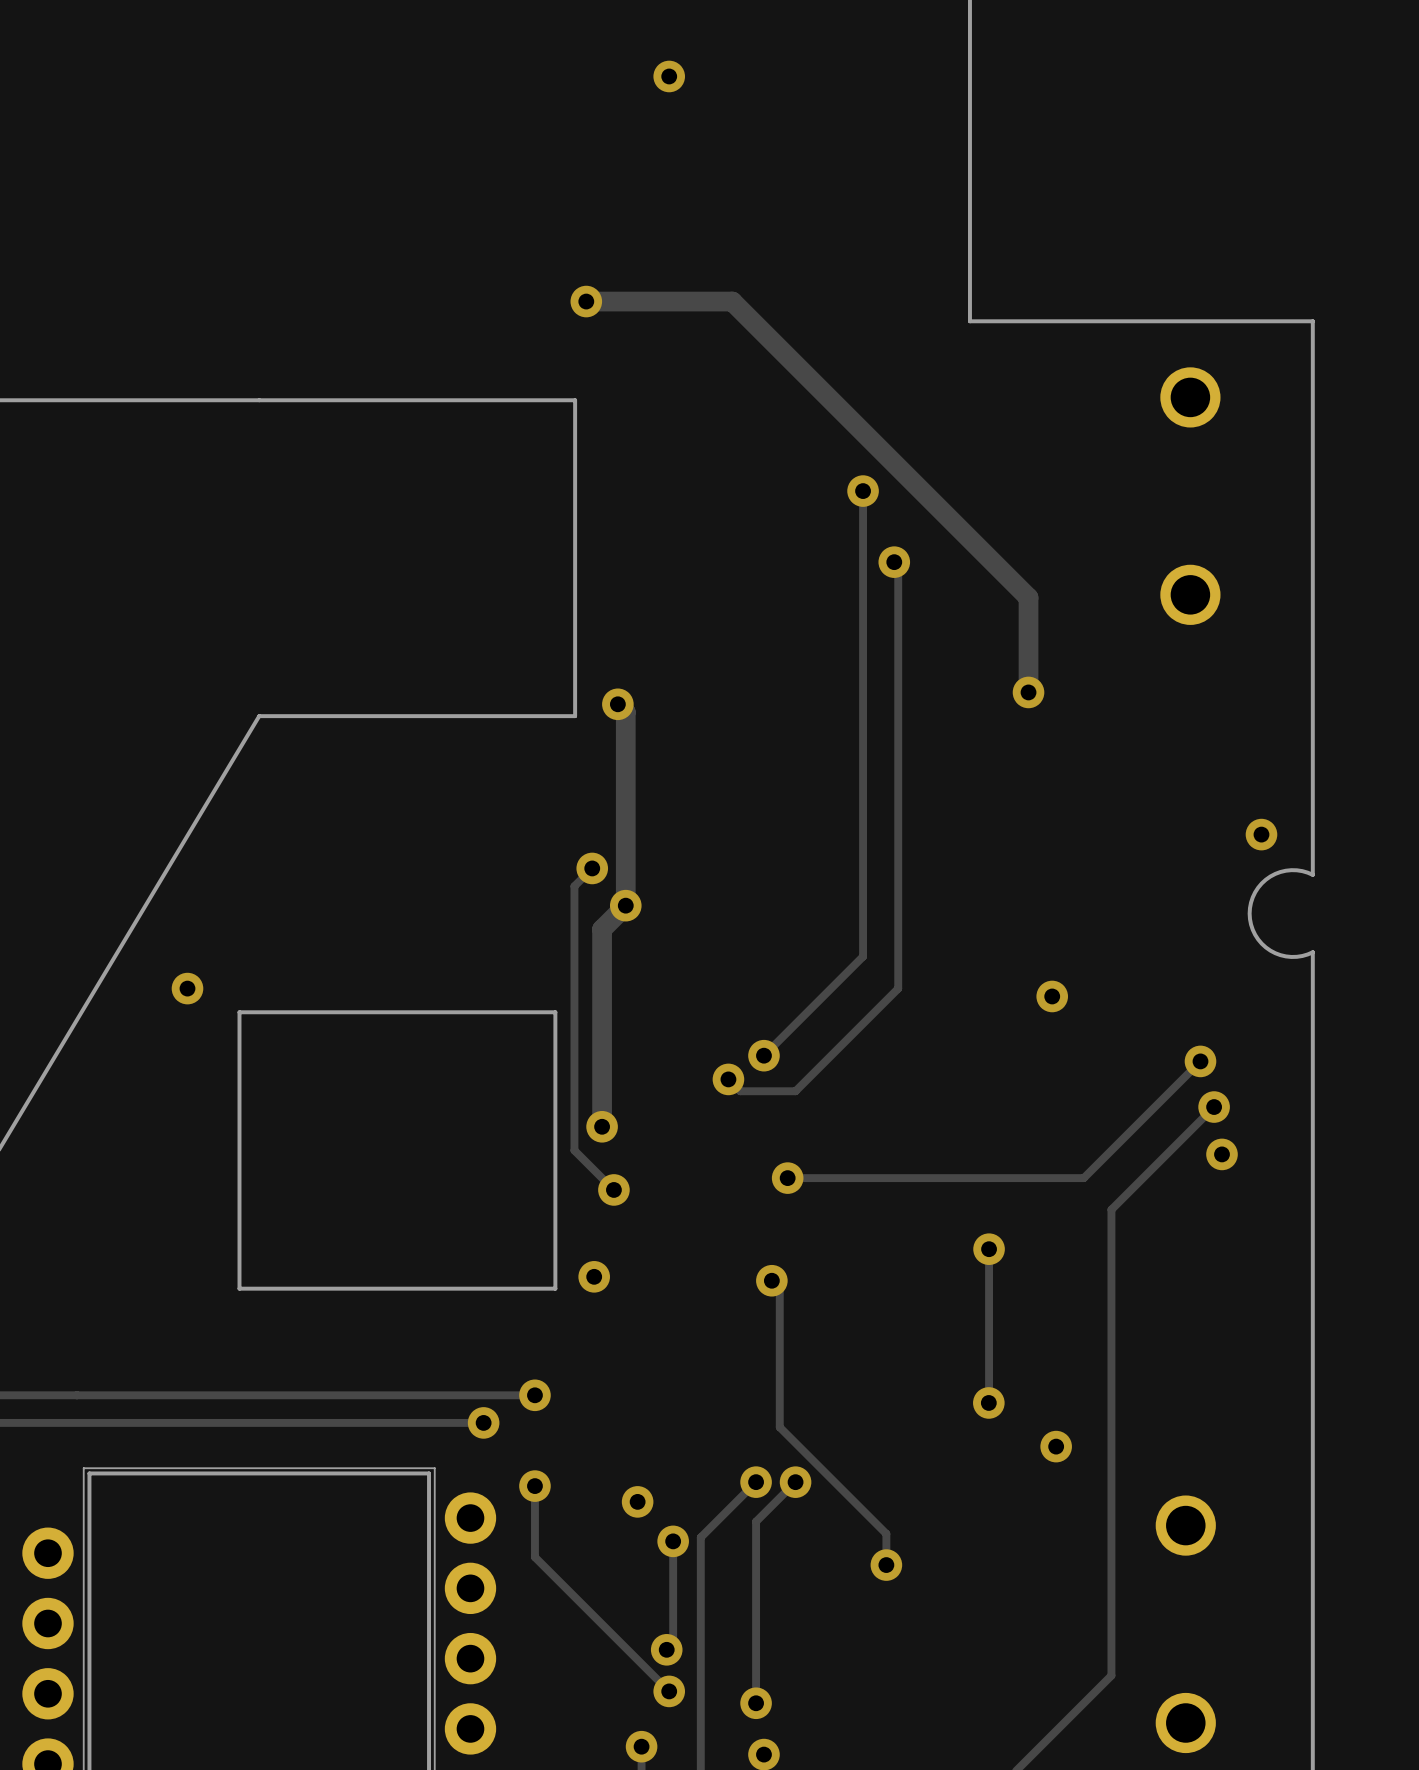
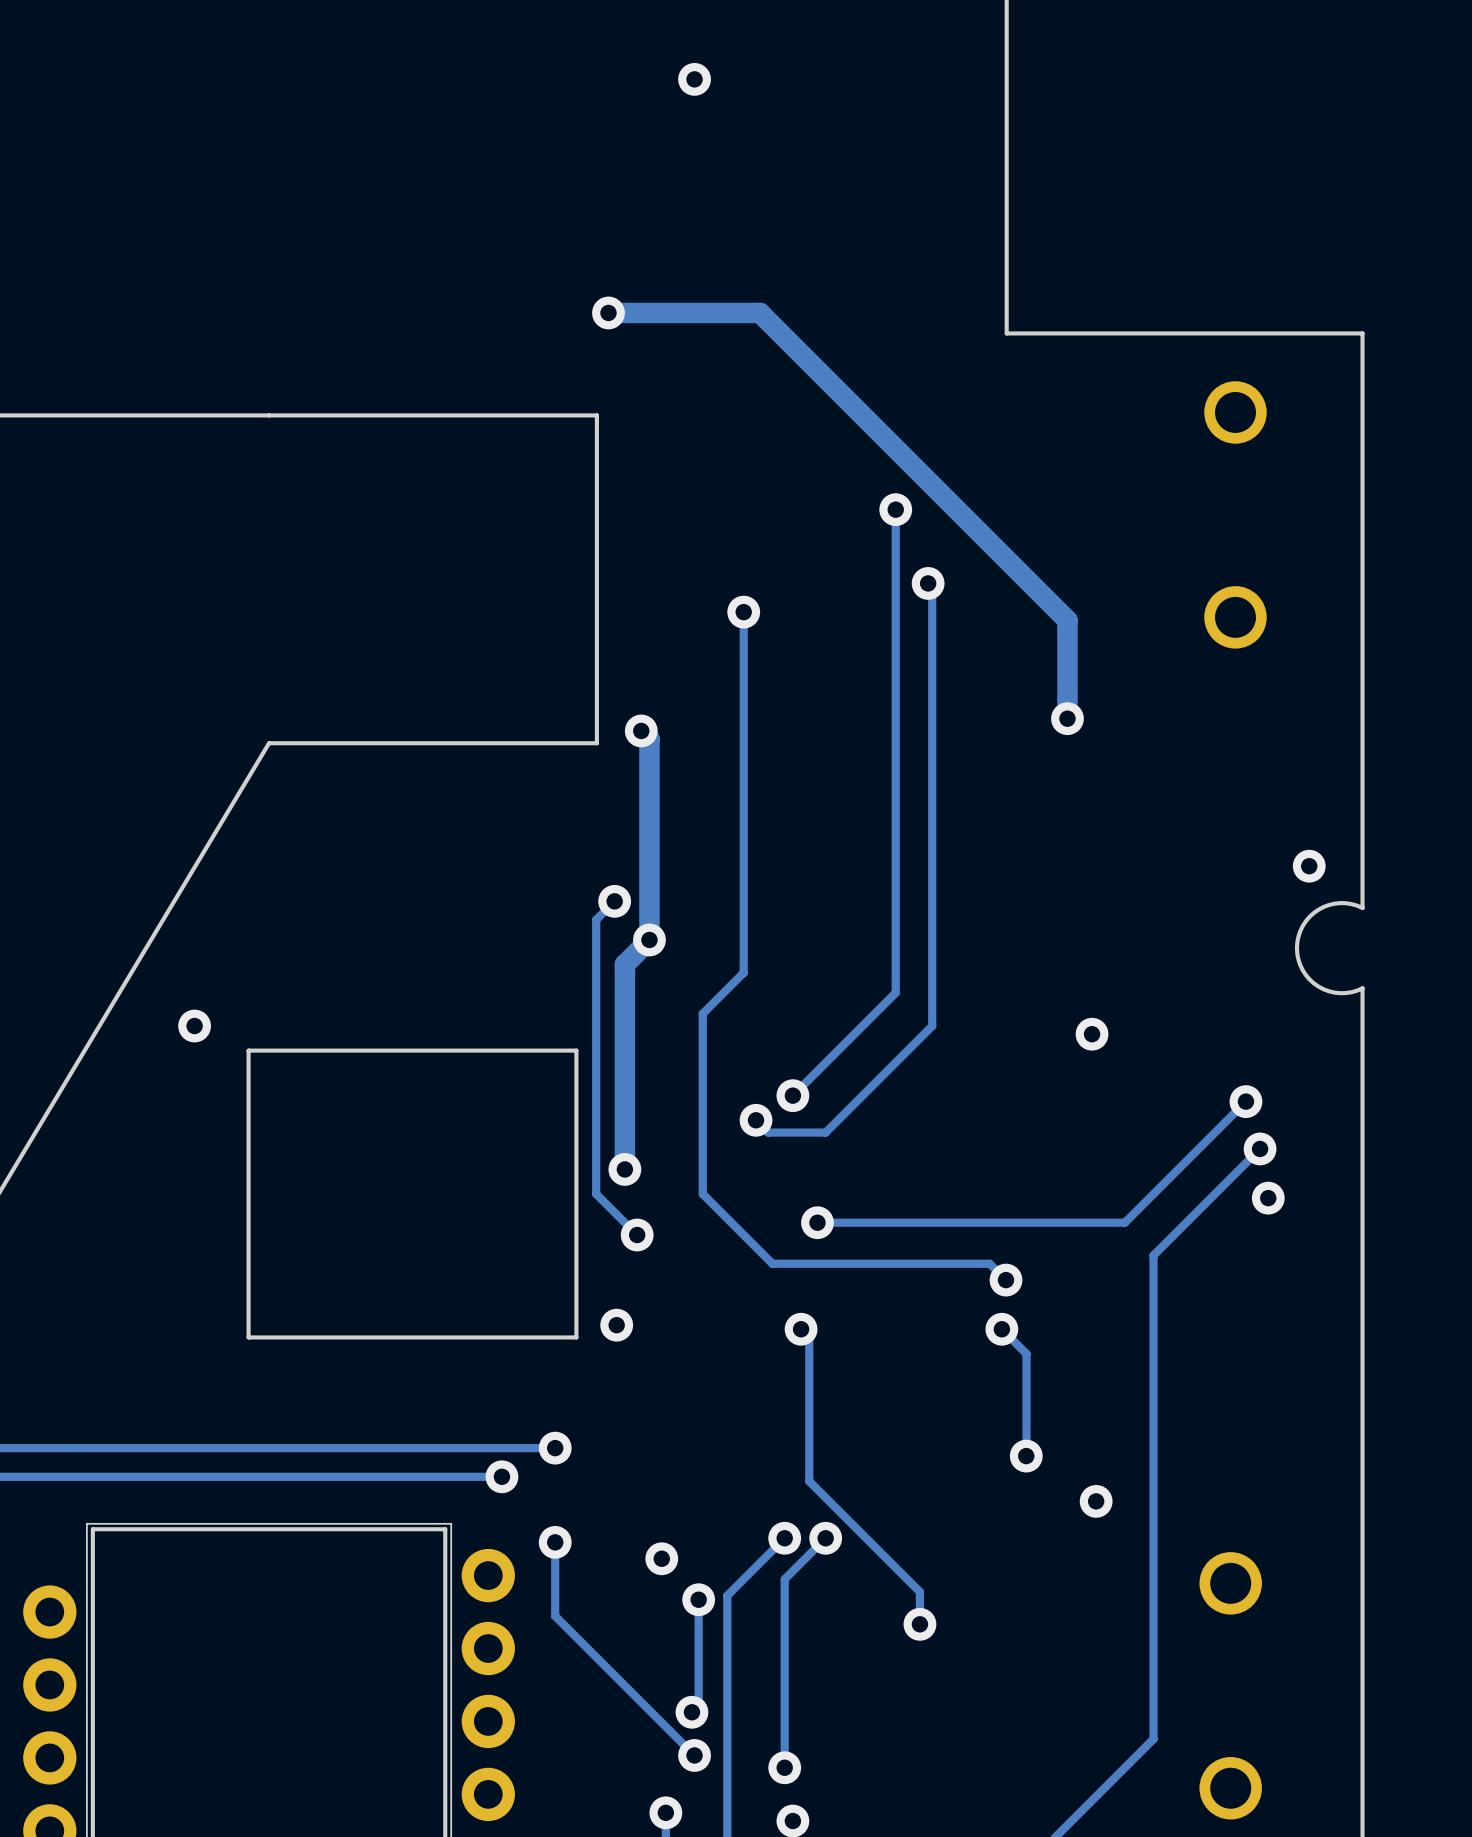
track: none -> (743, 612) (743, 972) (702, 1013) (702, 1194) (772, 1263) (989, 1263) (1006, 1280)
via: none -> (743, 612)
via: none -> (1006, 1280)
track: (989, 1249) (989, 1304) -> (1001, 1329) (1026, 1353)
via: (989, 1249) -> none
via: none -> (1001, 1329)

